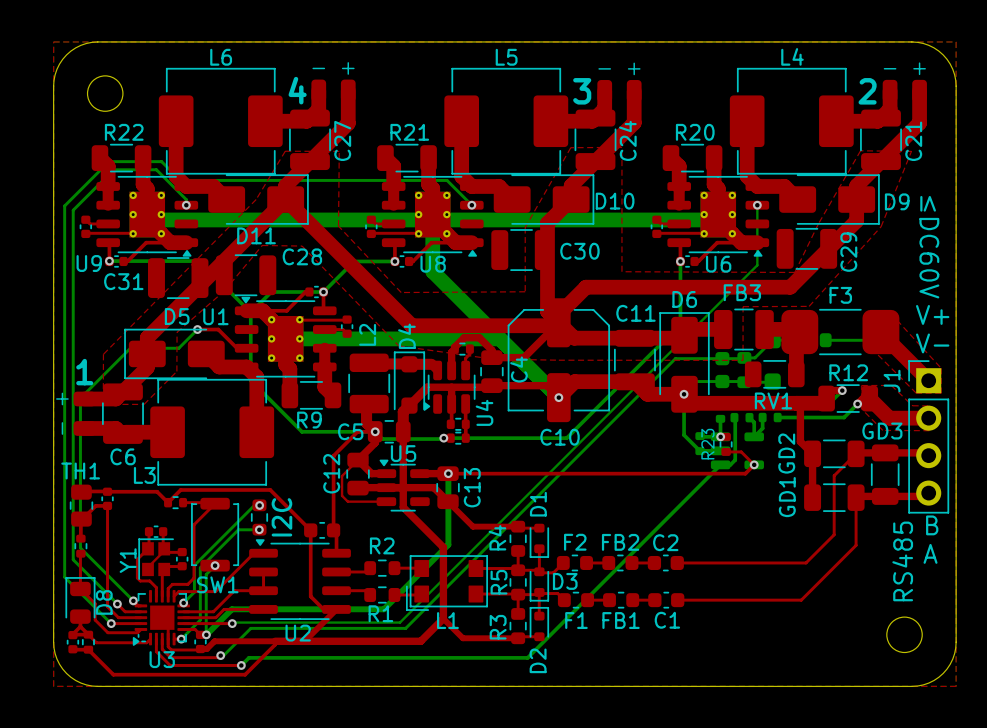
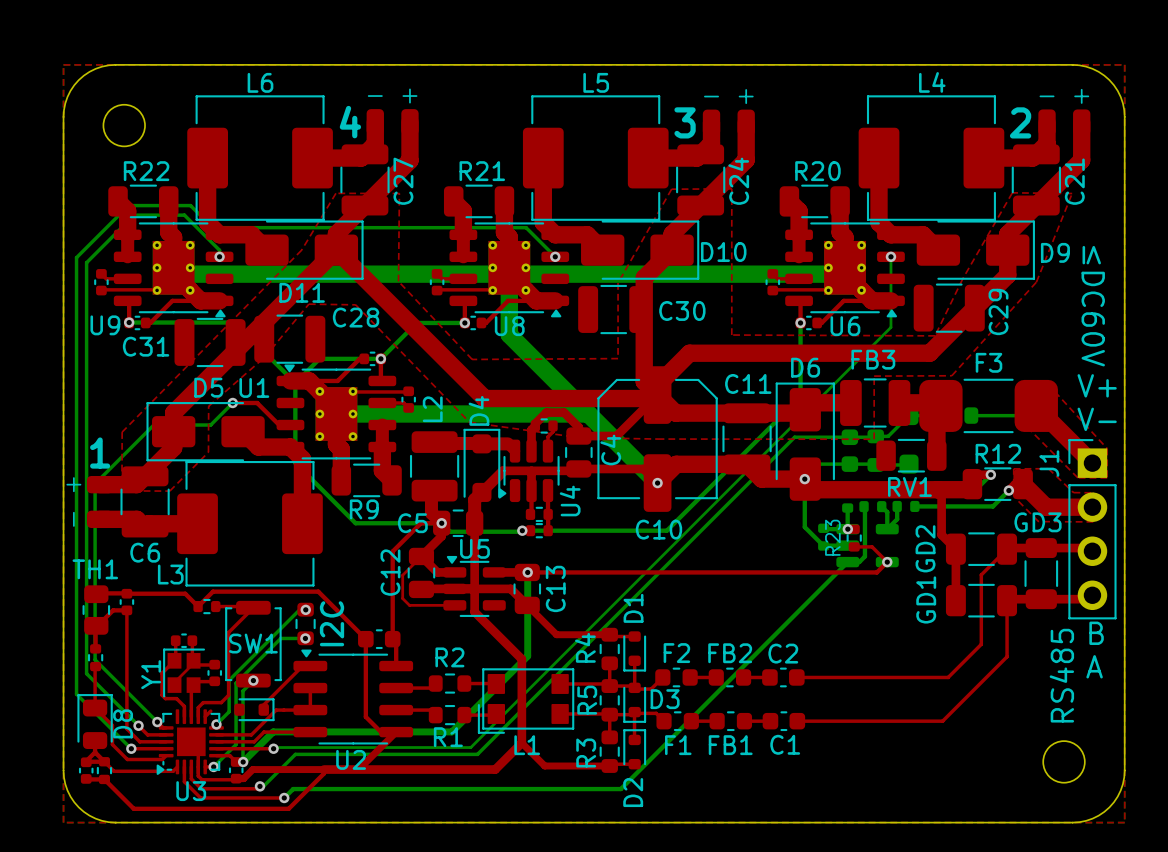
top track: (256, 553) (254, 553) (215, 591) (178, 591) -> (302, 666) (263, 704) (263, 709)
SW1 name position: SW1 (217, 584) -> SW1 (253, 643)
part: none -> (254, 709)

